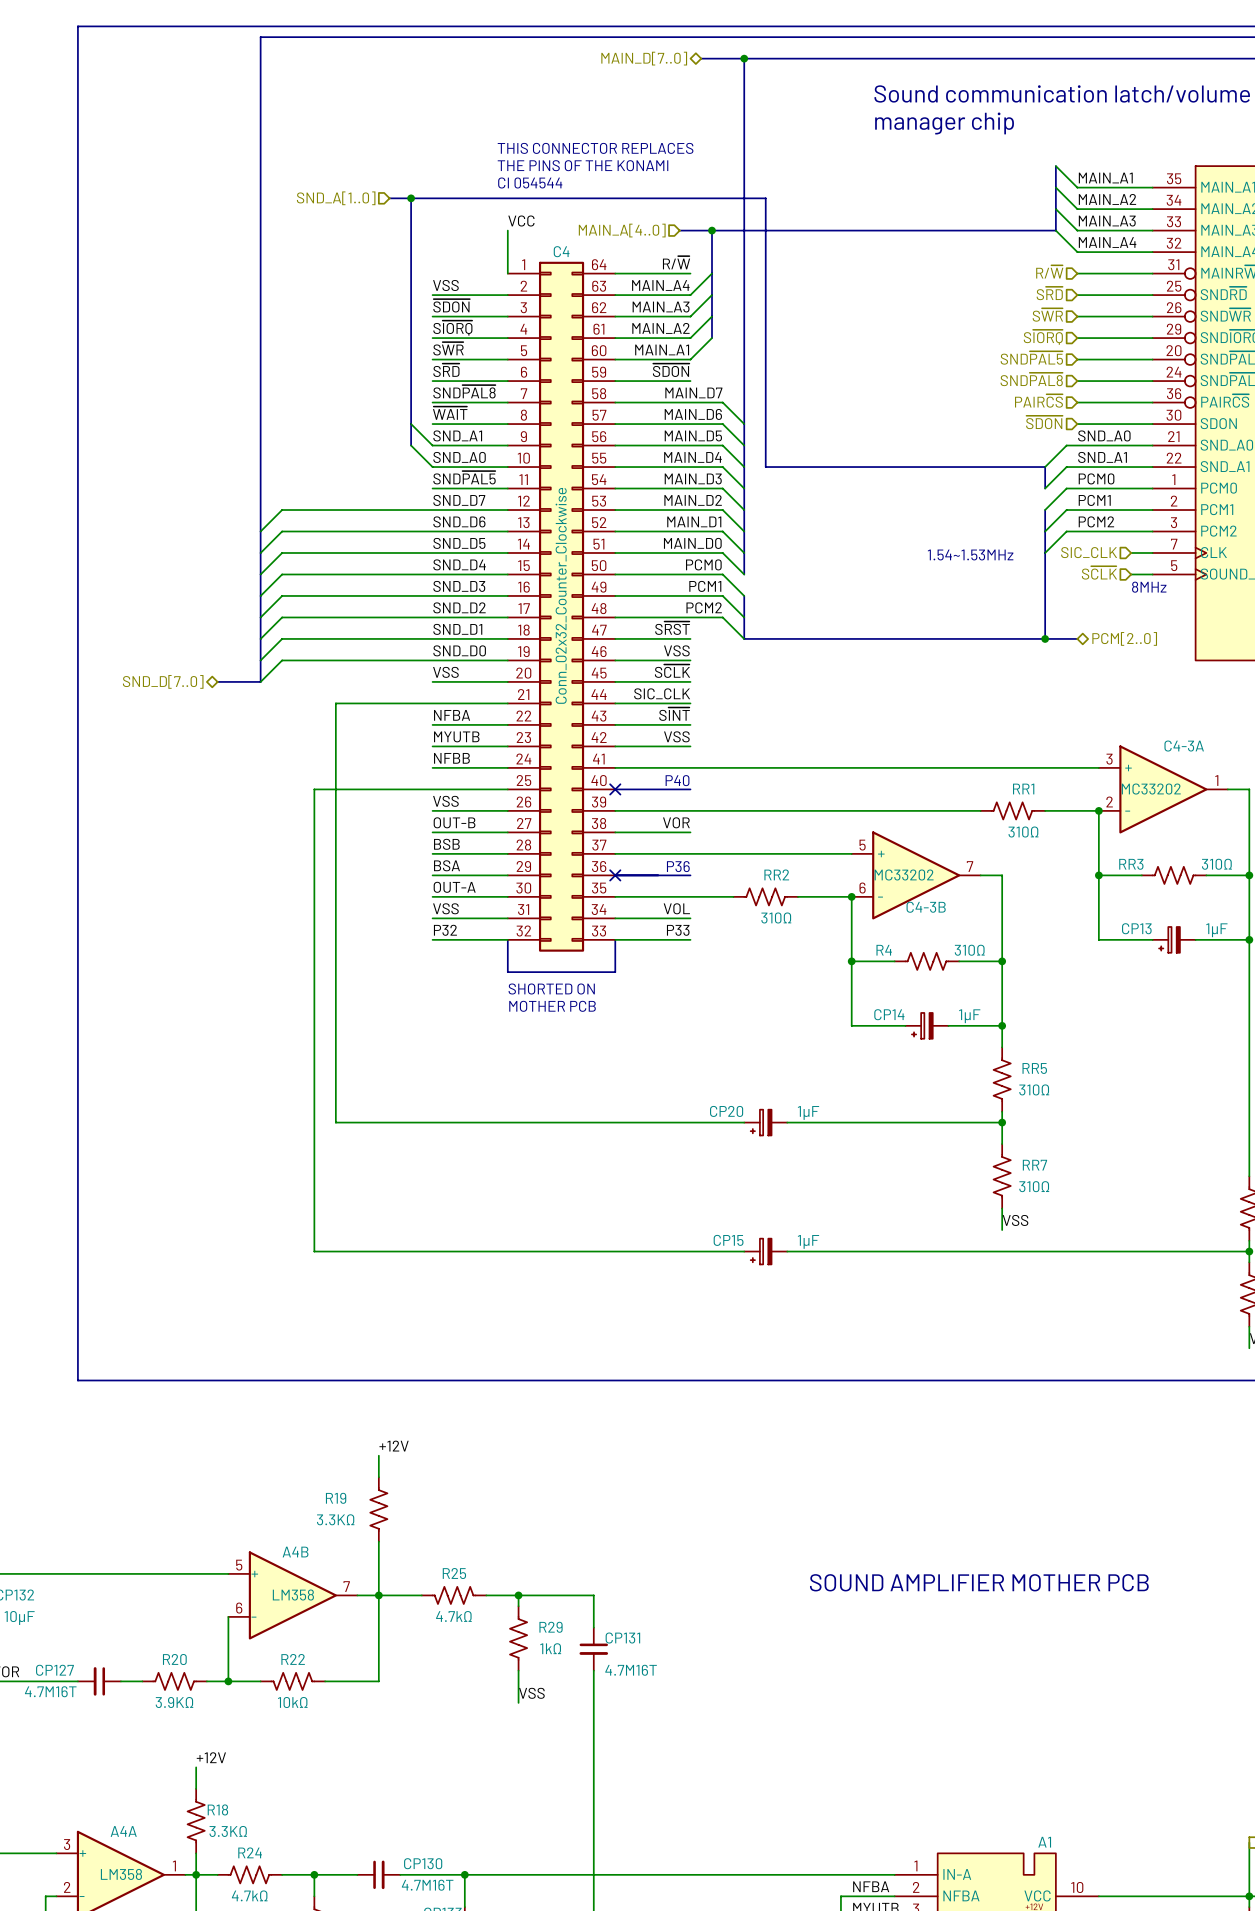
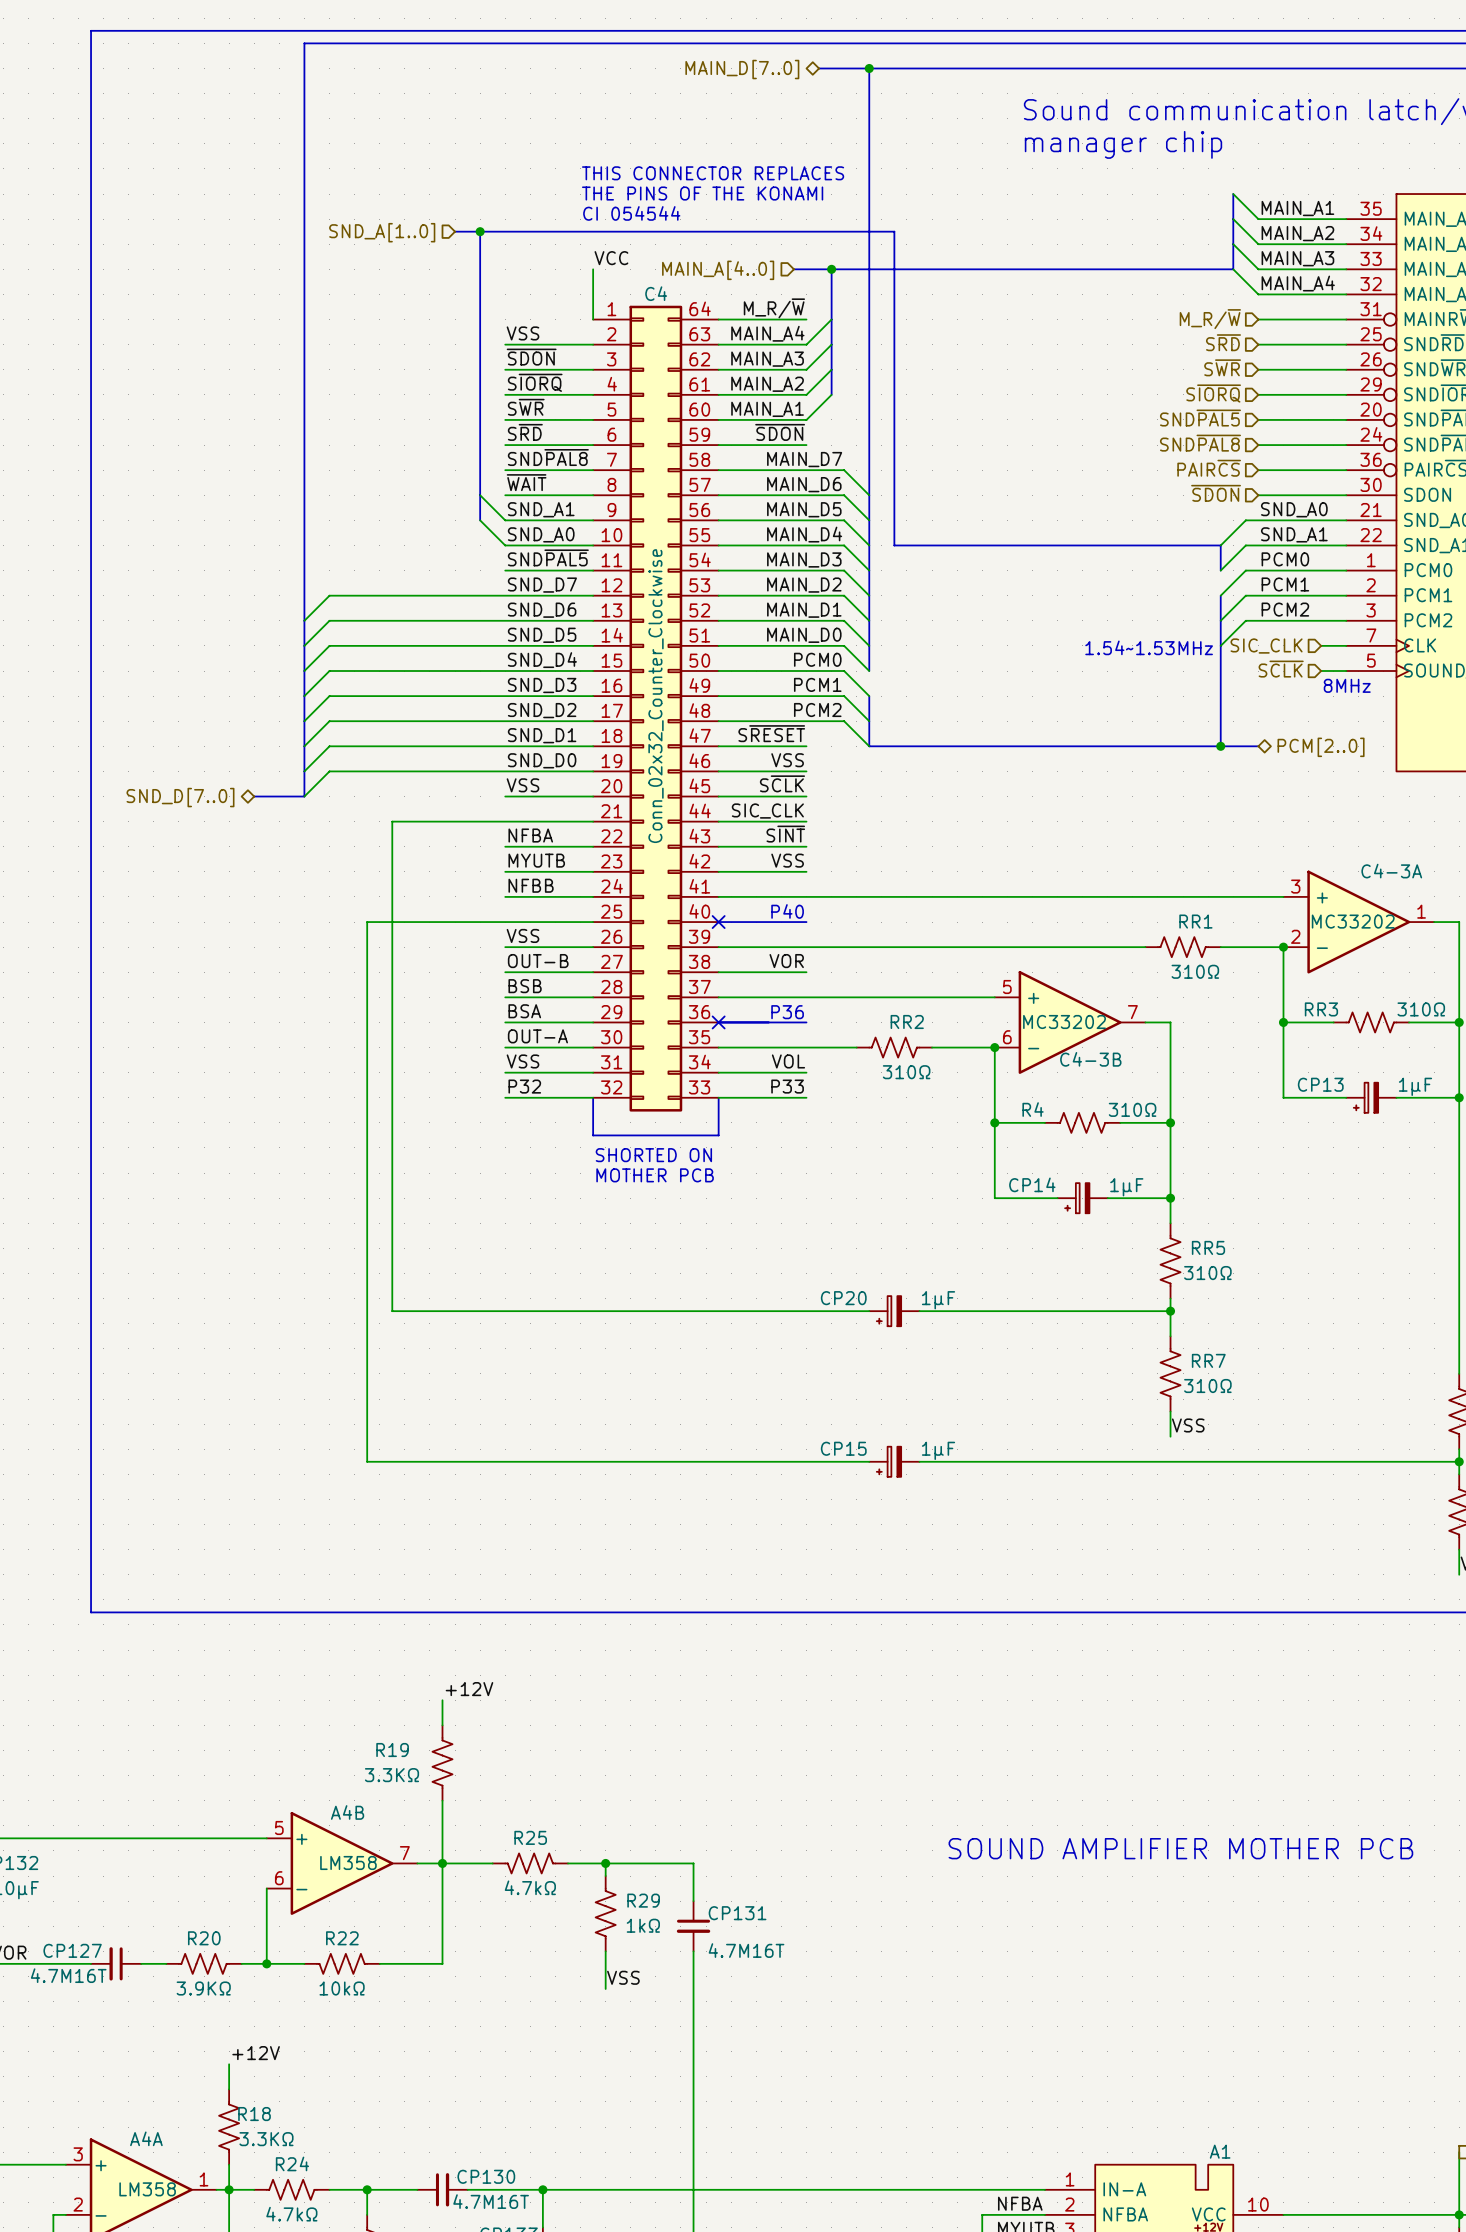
label: R/~{W} (676, 262) -> M_R/~{W} (774, 308)
hierarchical label: R/~{W} (1049, 271) -> M_R/~{W} (1210, 319)
label: S~{RST} (672, 628) -> S~{RESET} (771, 733)

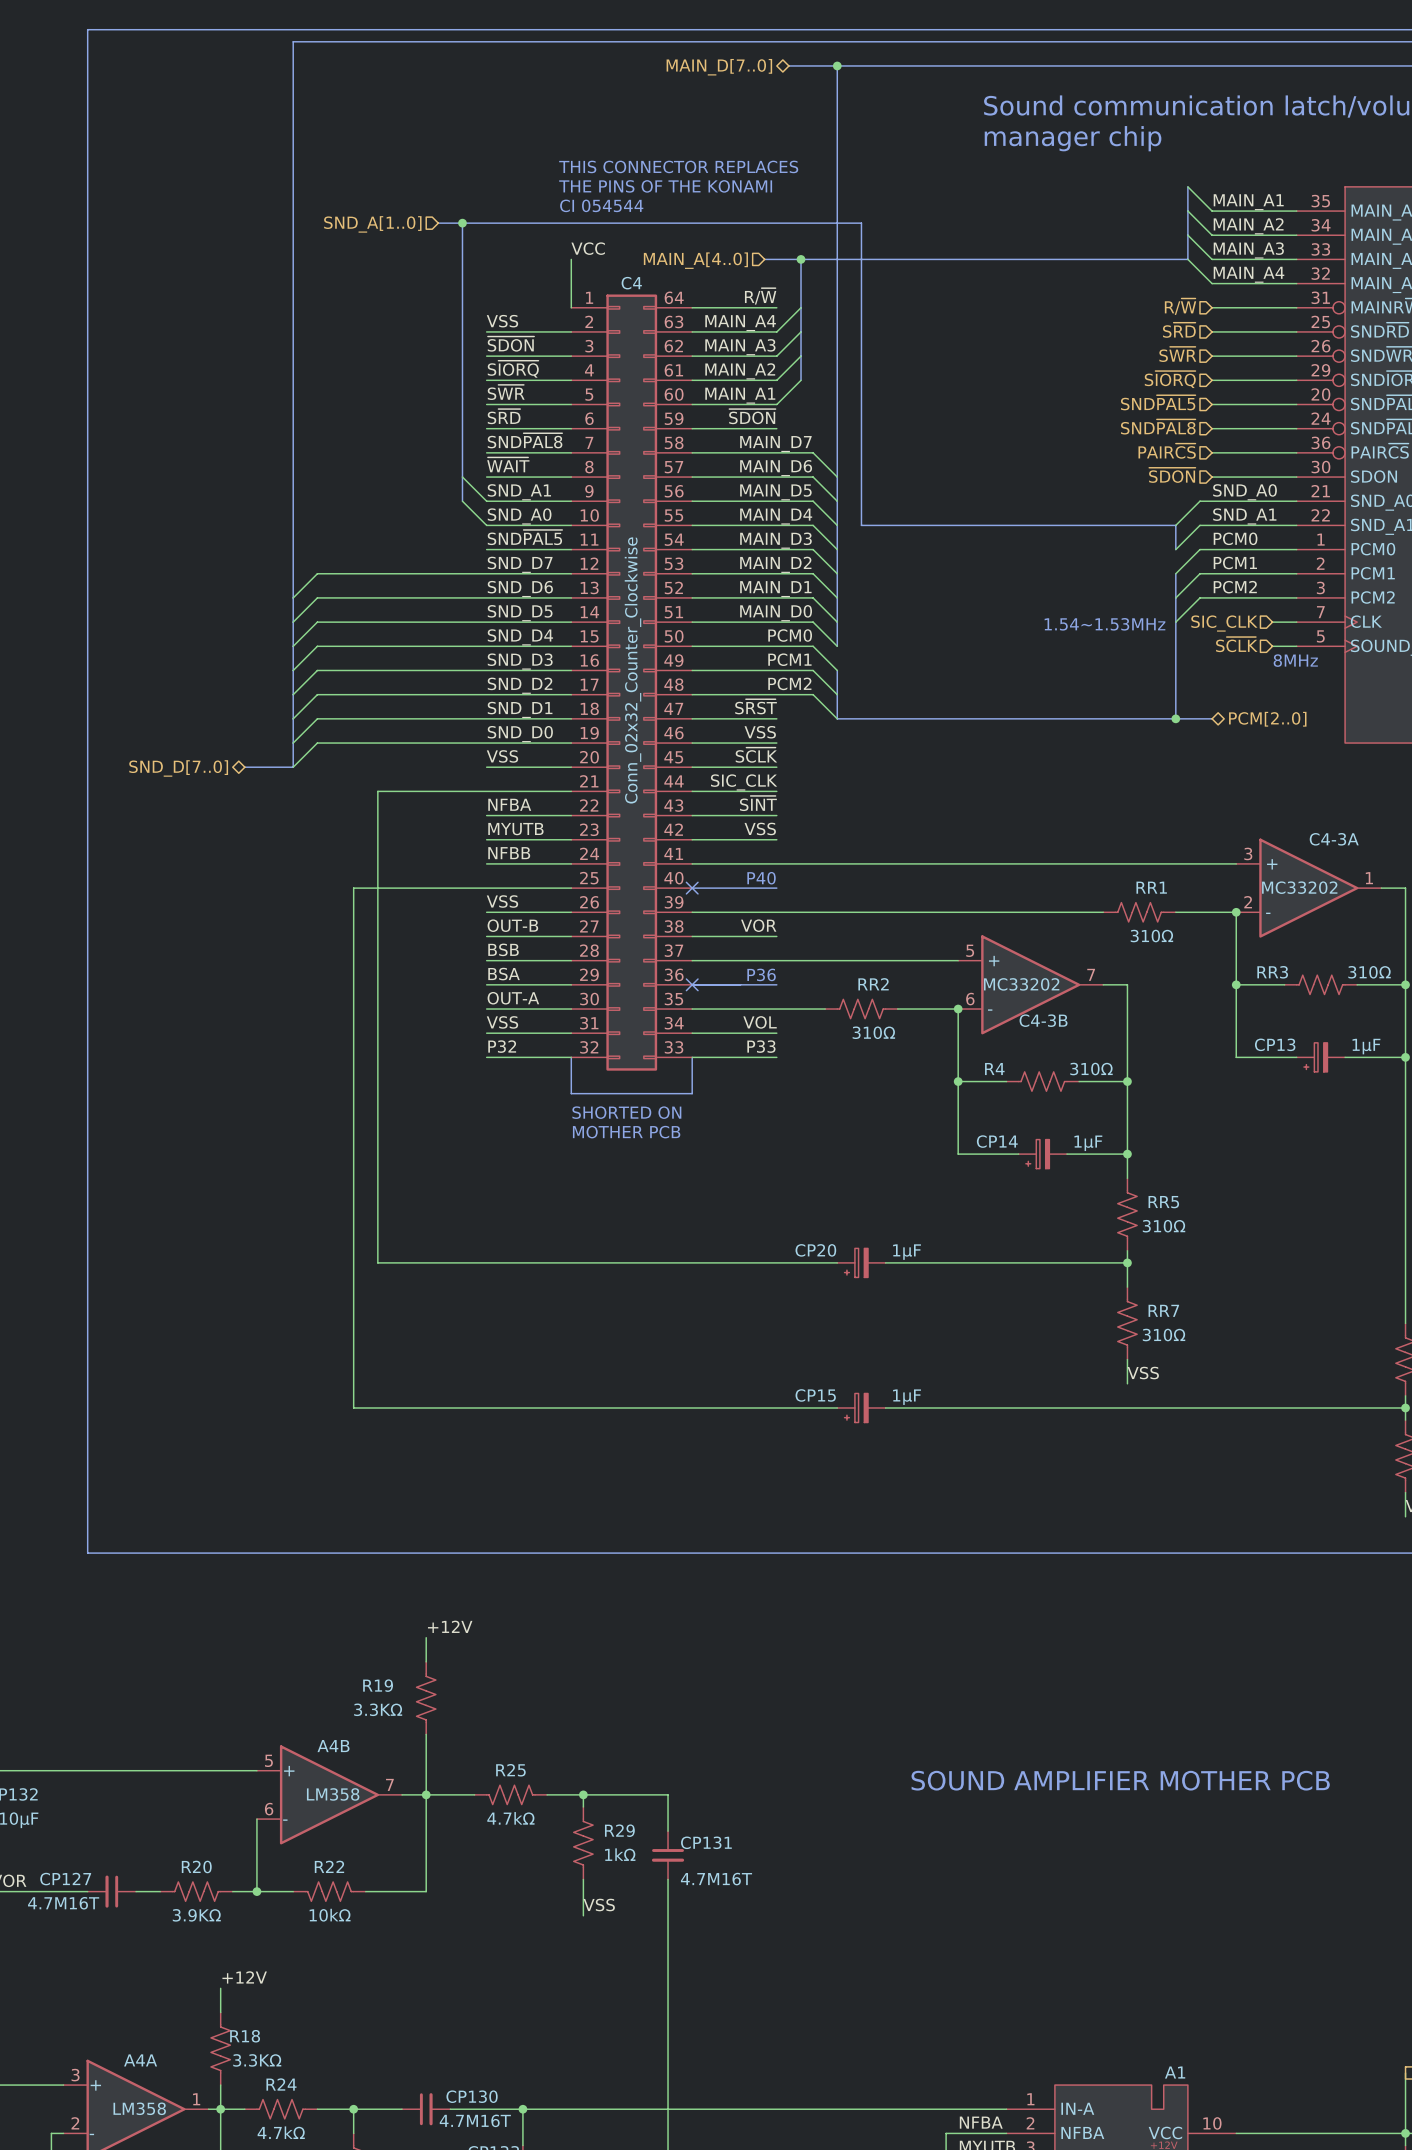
label: M_R/~{W} (774, 308) -> R/~{W} (760, 296)
hierarchical label: M_R/~{W} (1210, 319) -> R/~{W} (1180, 306)
label: S~{RESET} (771, 733) -> S~{RST} (756, 706)

